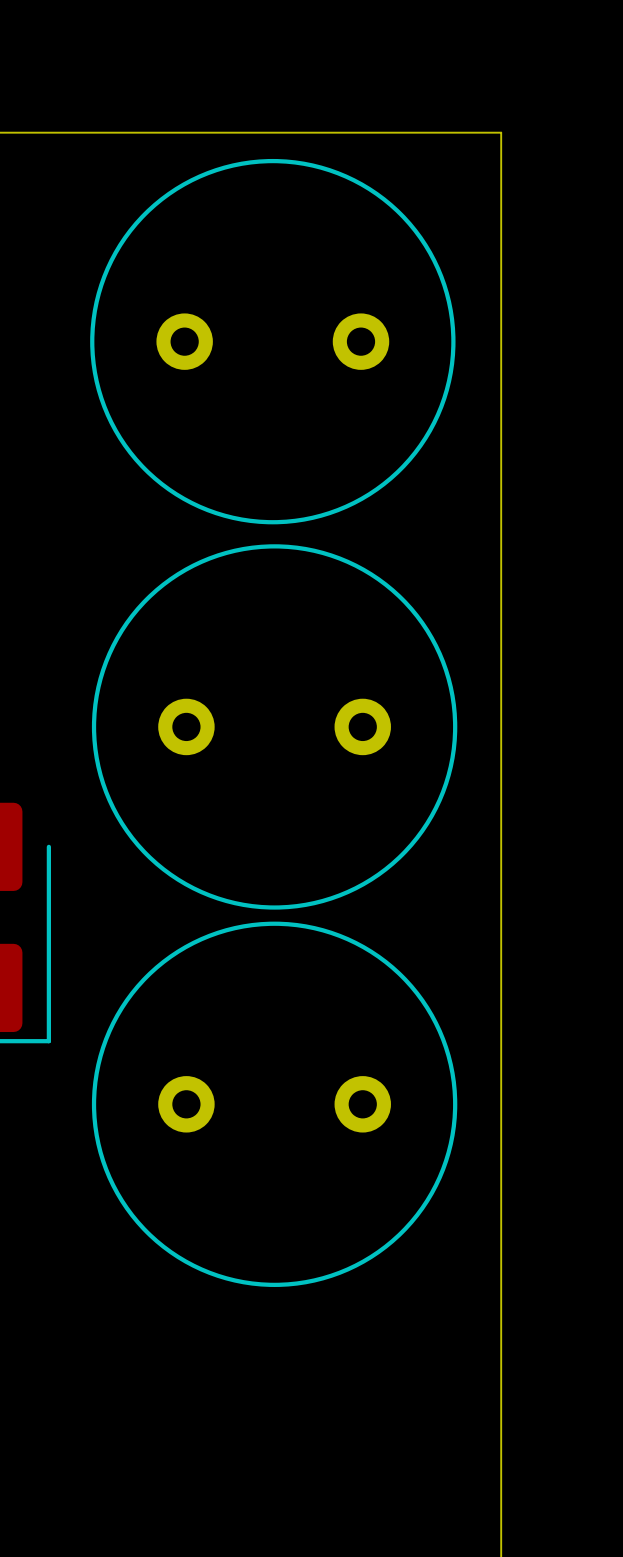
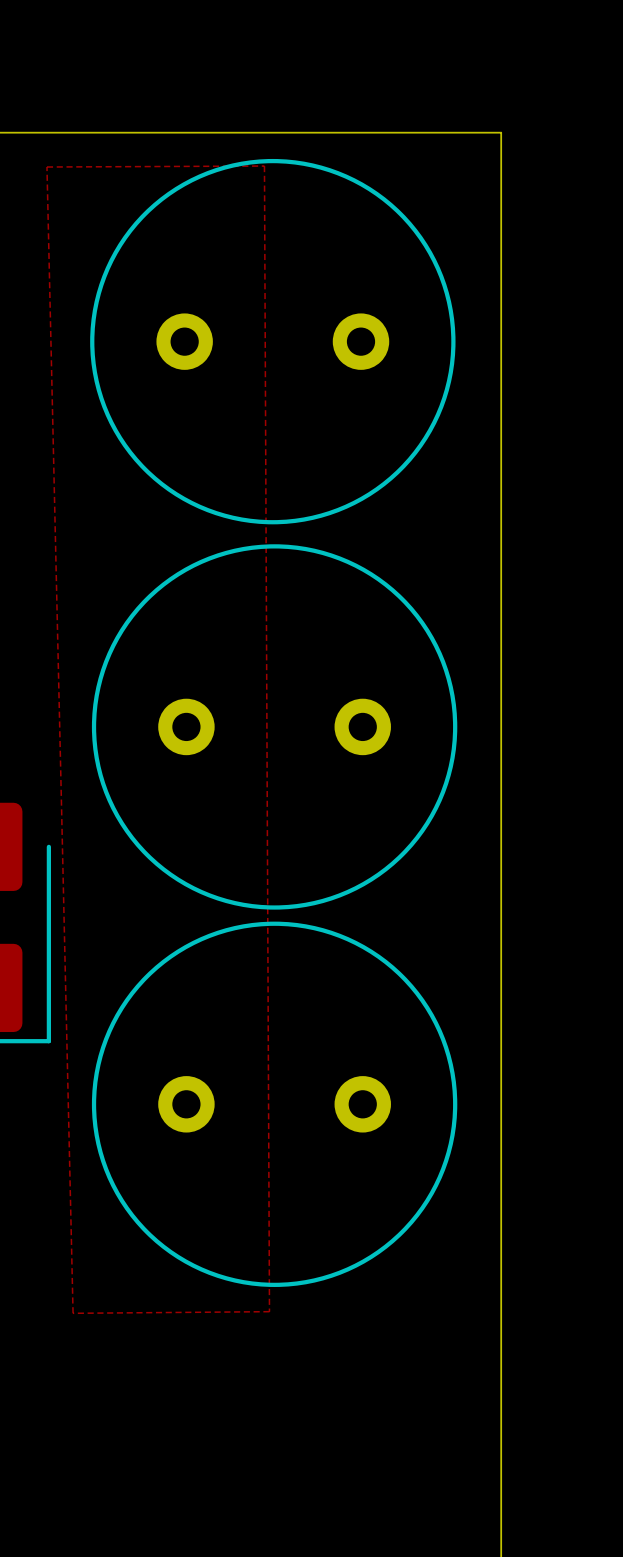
top zone outline: none -> (264, 166) (46, 167) (73, 1313) (269, 1311) (264, 166)

